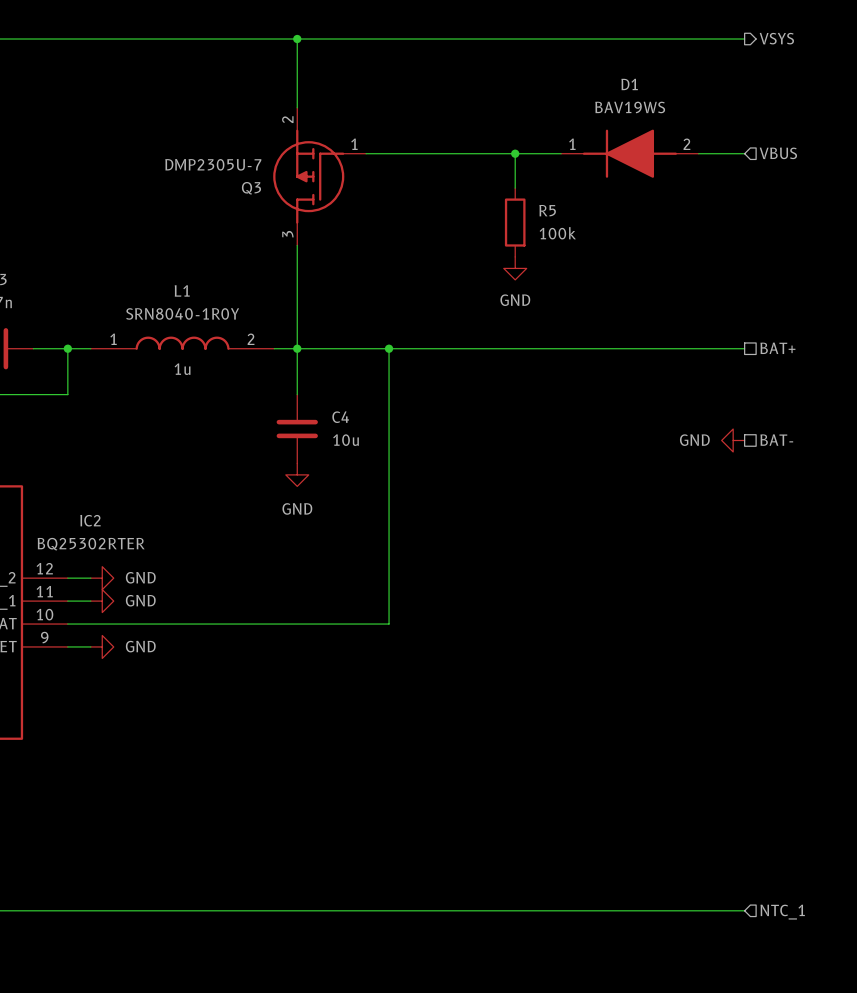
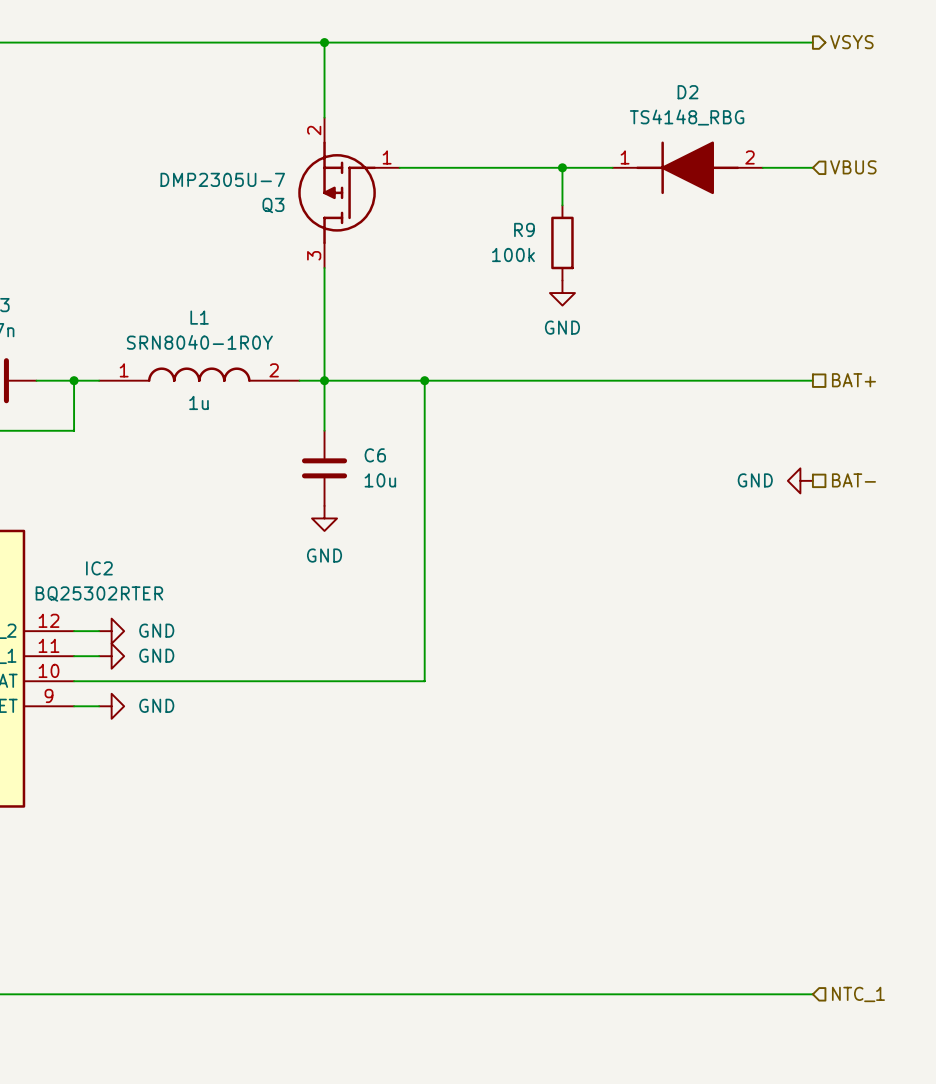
D1 name: D1 (629, 84) -> D2 (687, 92)
D1 value: BAV19WS (630, 107) -> TS4148_RBG (687, 117)
R5 name: R5 (547, 210) -> R9 (524, 229)
R5 value position: 100k (557, 233) -> 100k (513, 255)
C4 name: C4 (340, 417) -> C6 (375, 455)

